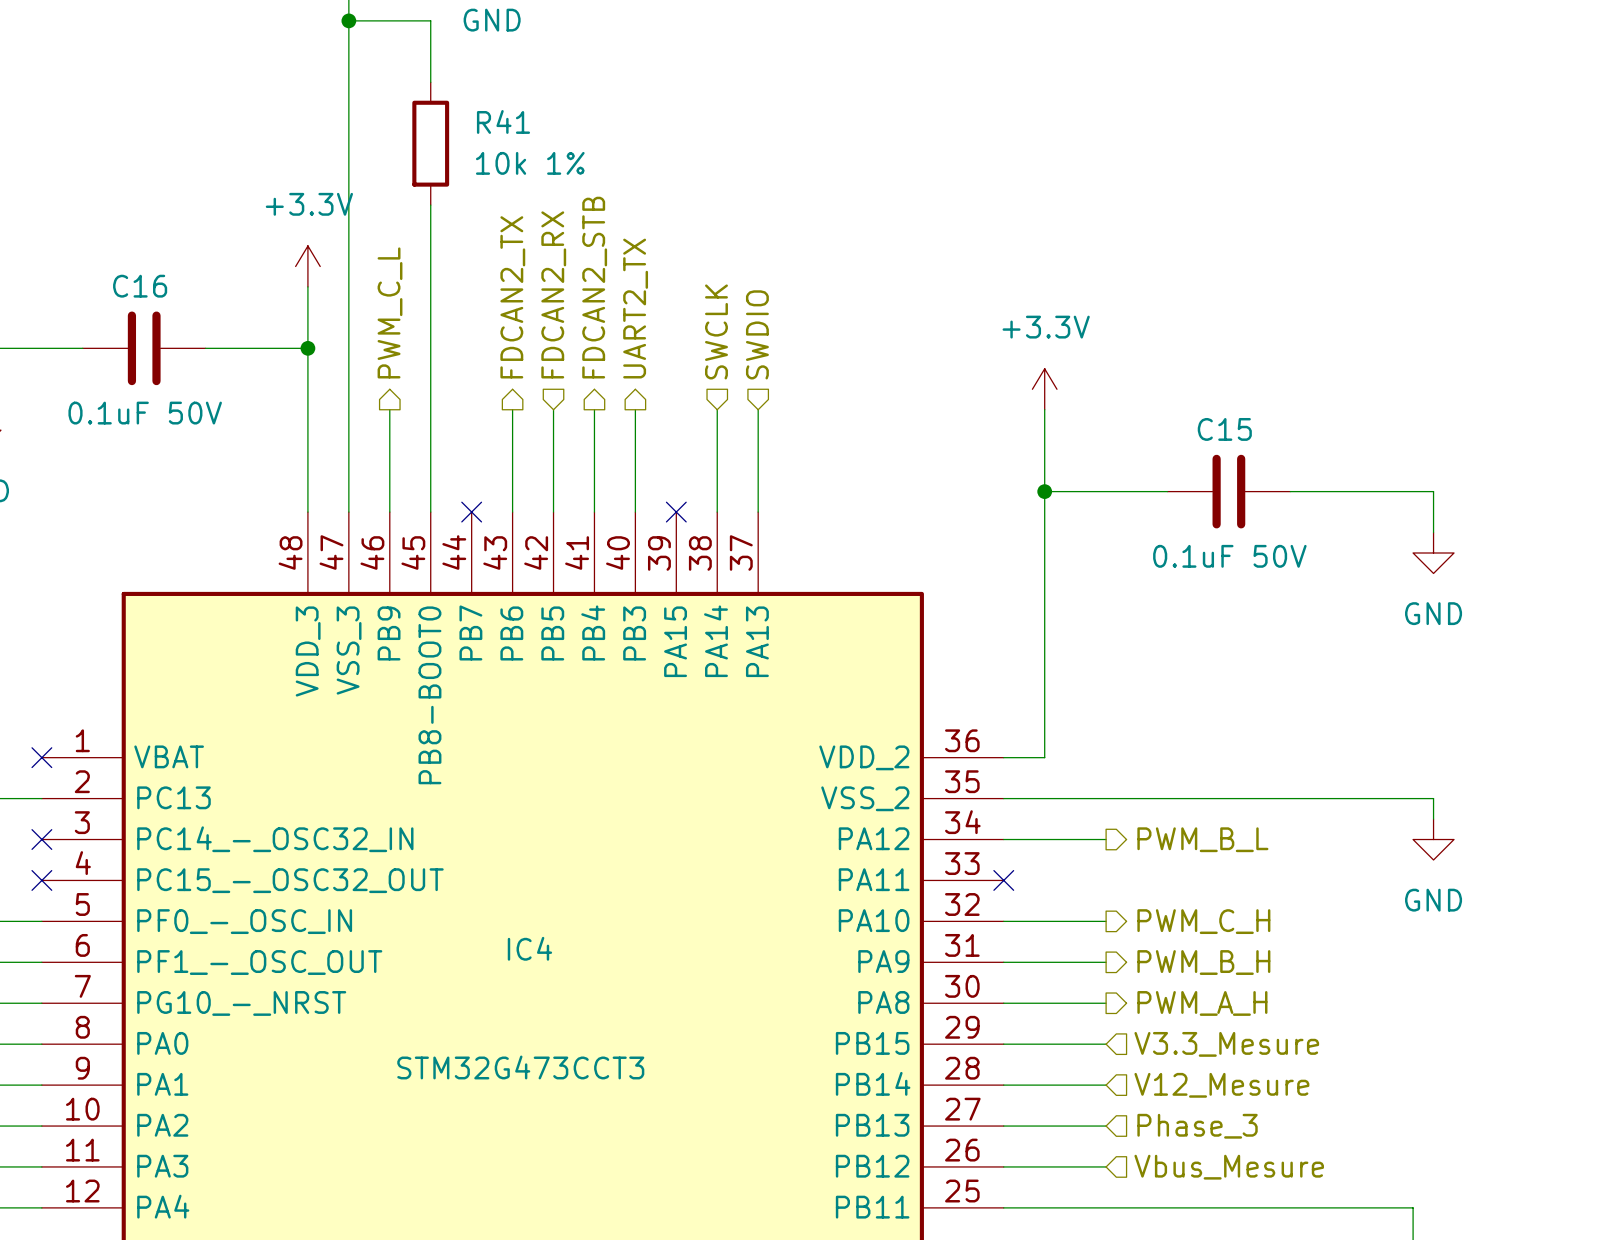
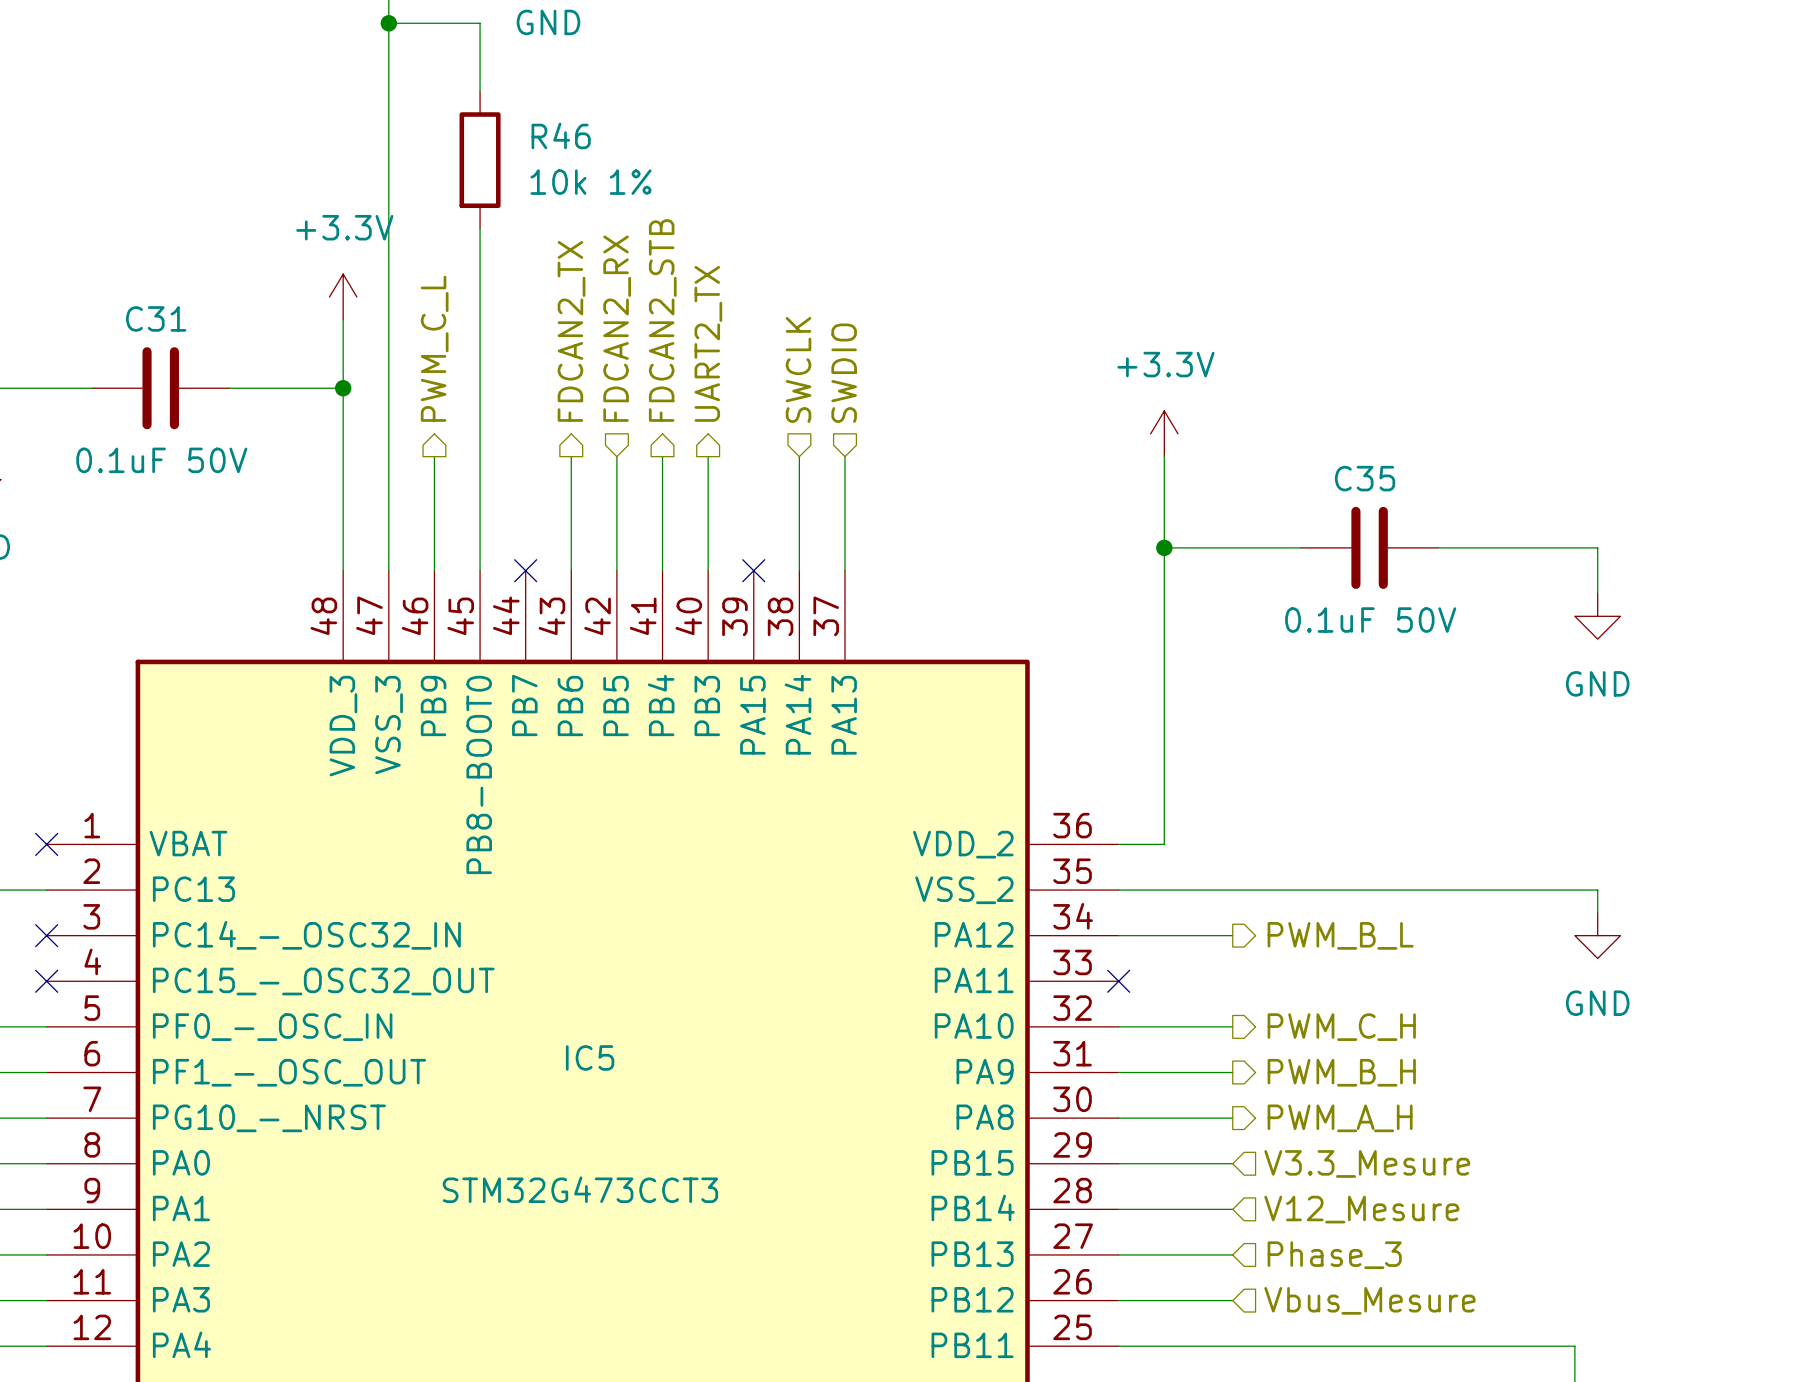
R41 name: R41 (503, 121) -> R46 (561, 135)
C16 name: C16 (140, 286) -> C31 (156, 318)
C15 name: C15 (1224, 429) -> C35 (1365, 478)
IC4 name: IC4 (529, 948) -> IC5 (590, 1057)

